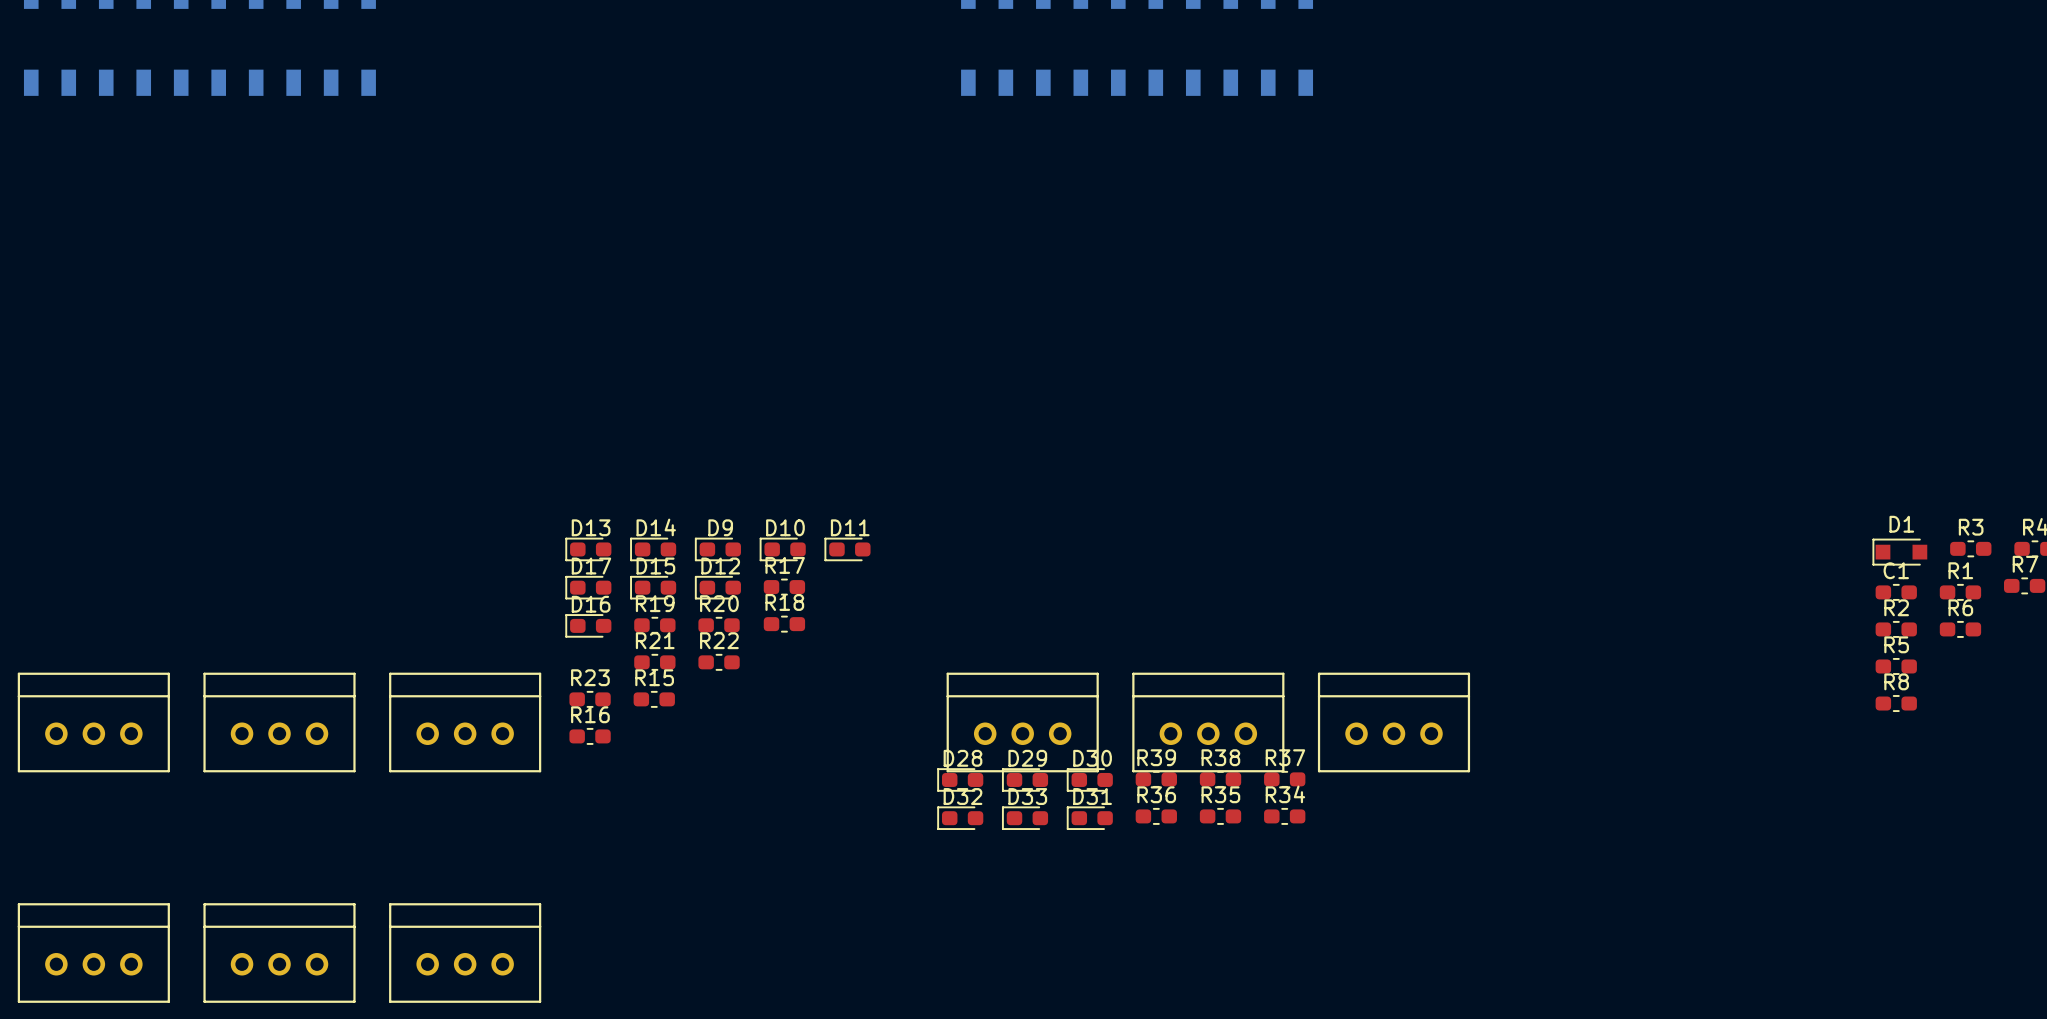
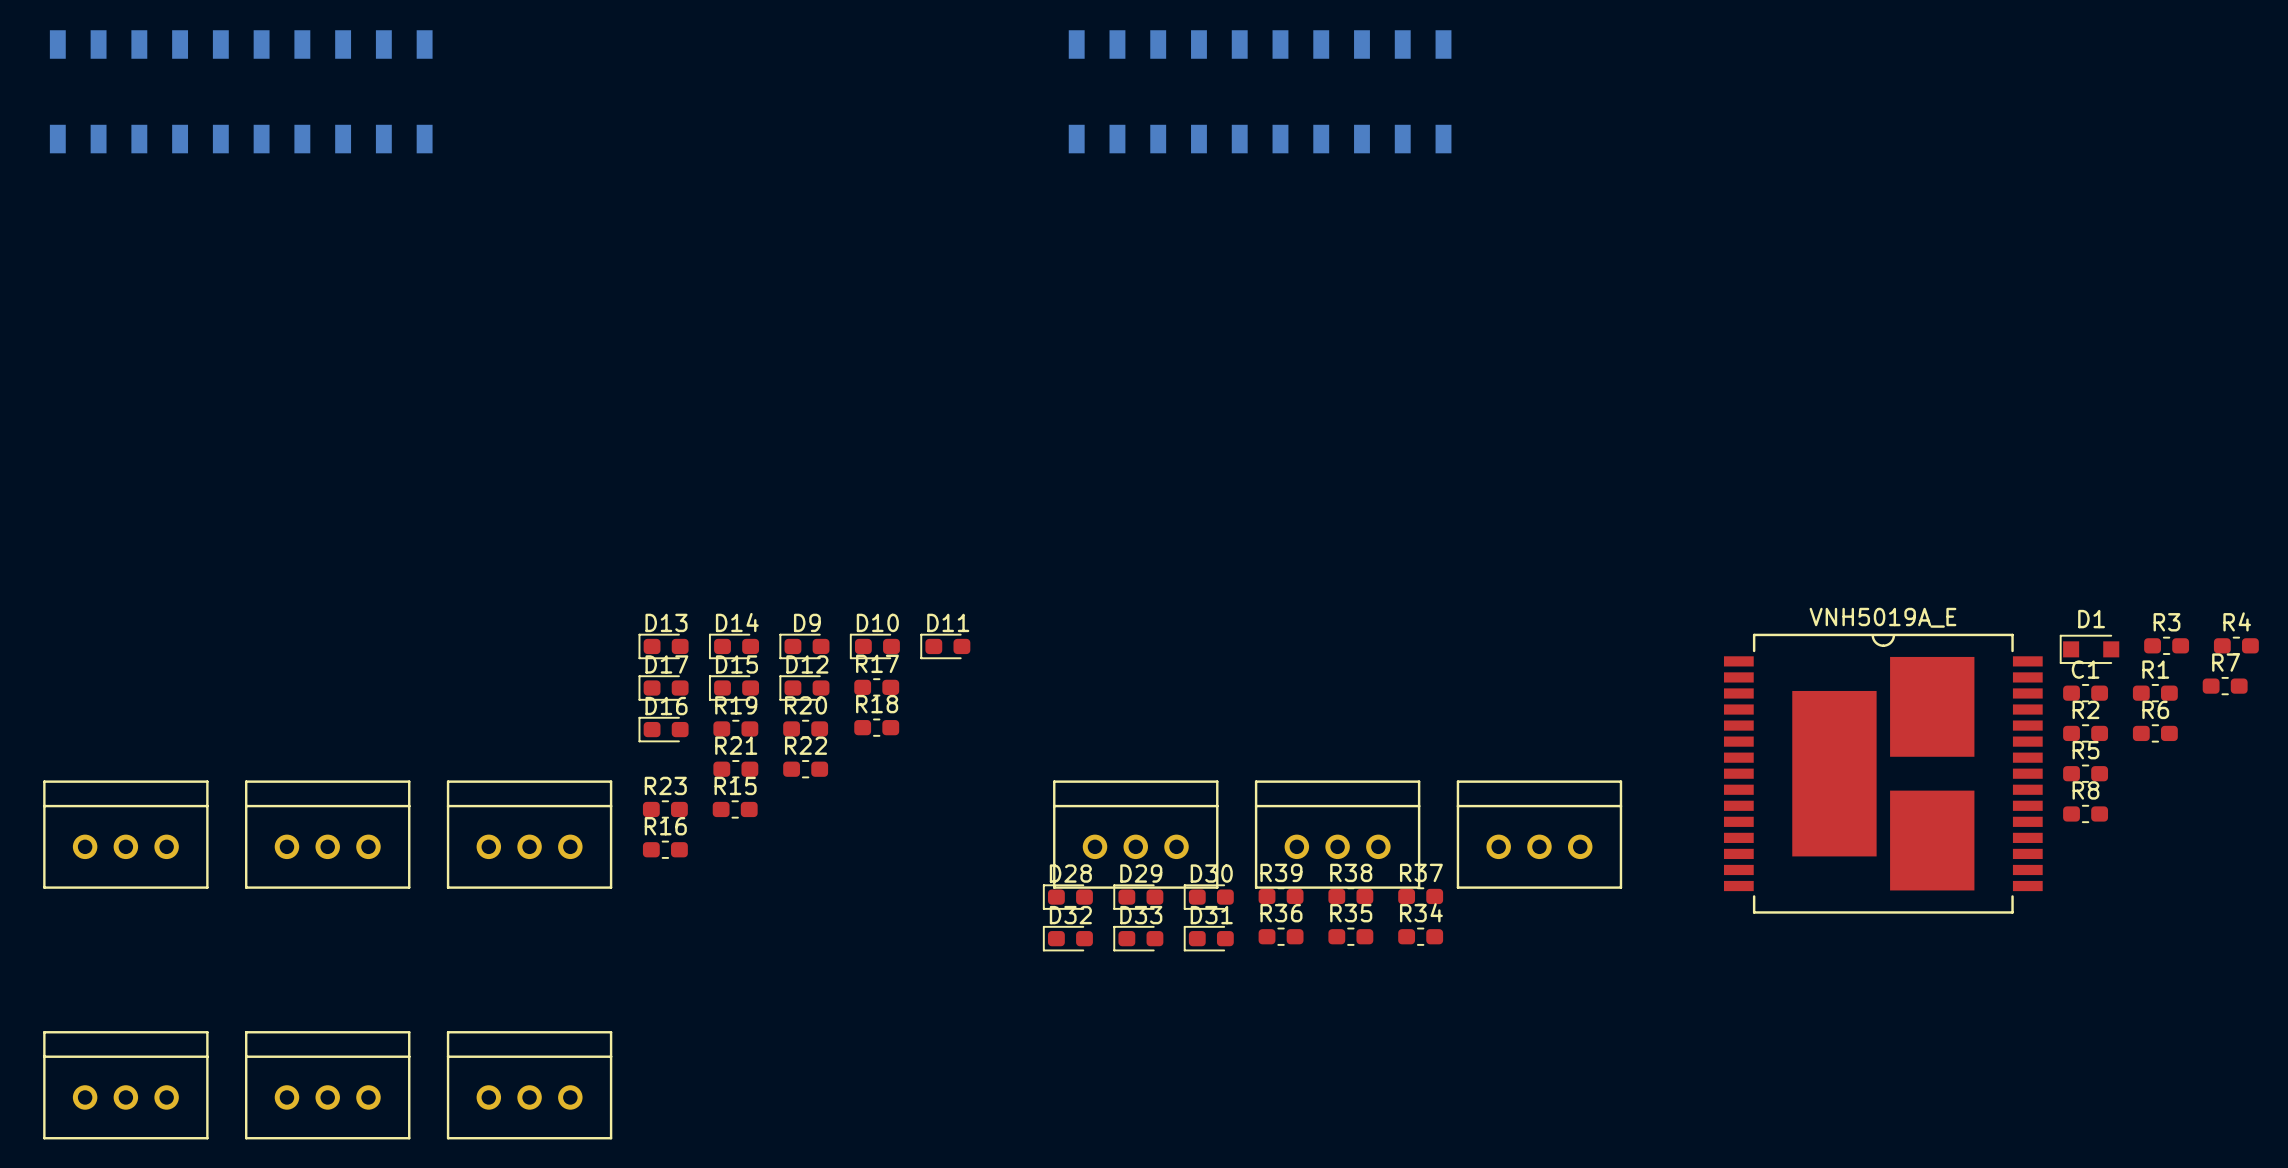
part: none -> VNH5019A_E (1883, 773)

